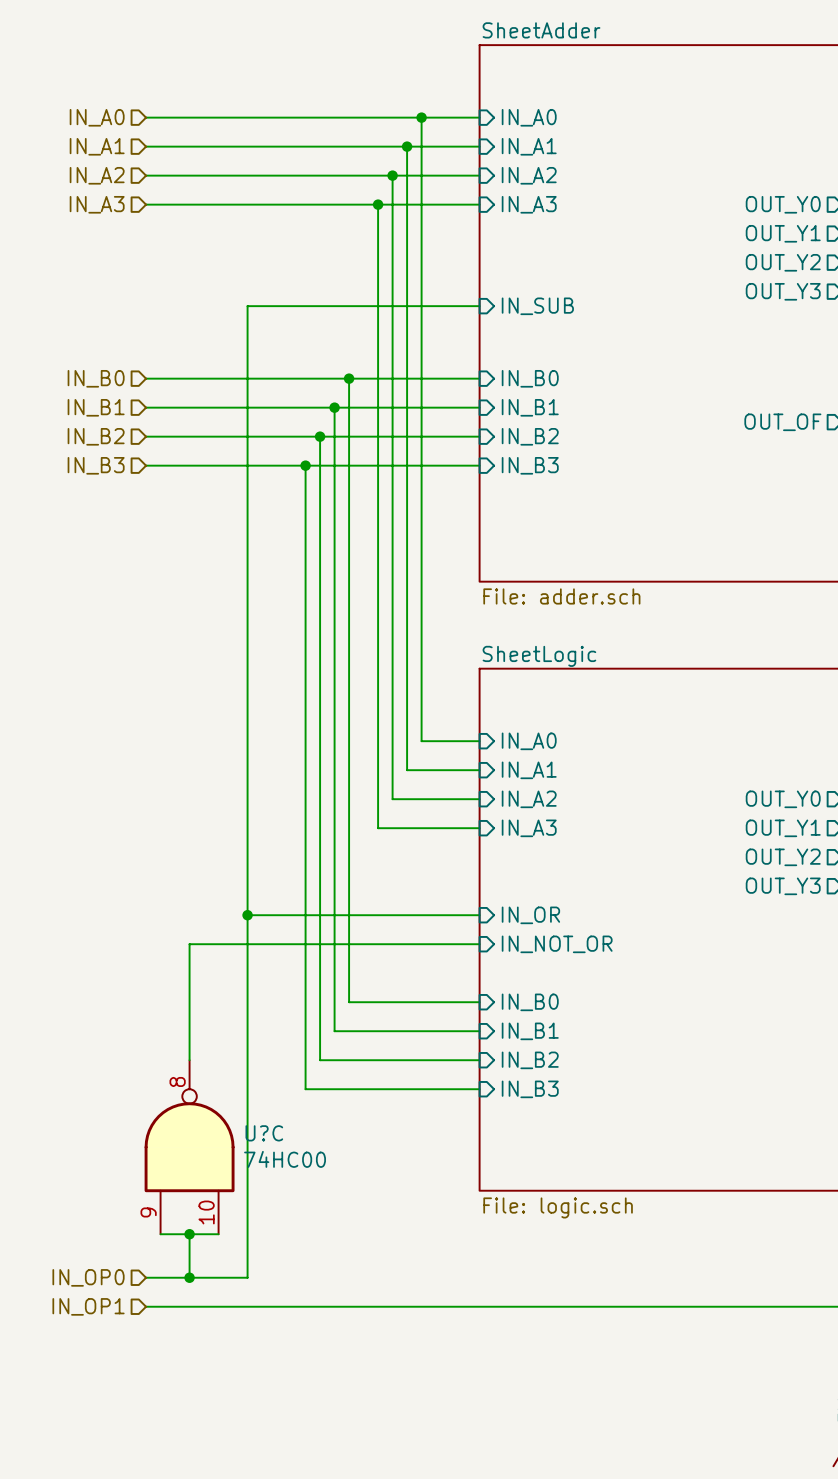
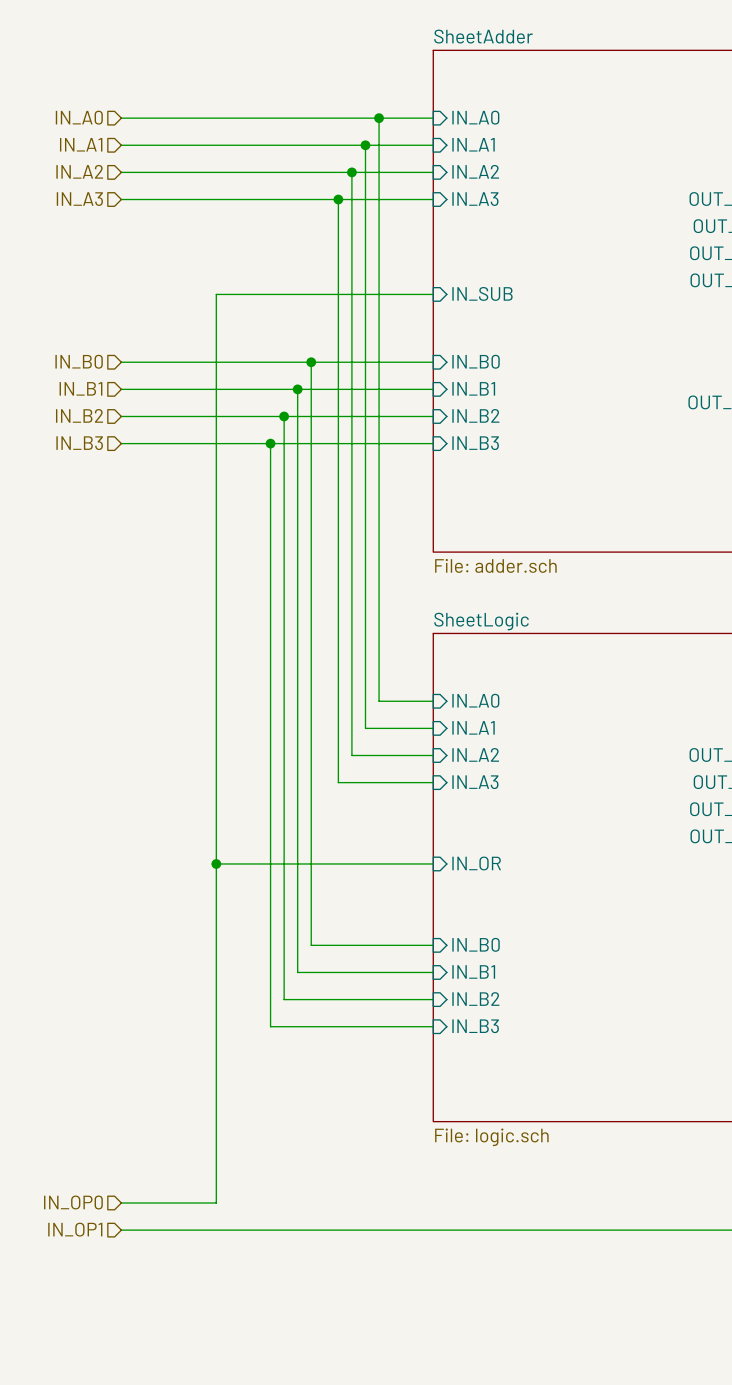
wire: (479, 944) (189, 944) (189, 1060) -> none
sheet pin: IN_NOT_OR (557, 944) -> none
U?C: 74HC00 (189, 1147) -> none
wire: (160, 1234) (218, 1234) -> none
wire: (189, 1234) (189, 1277) -> none
junction: (189, 1234) -> none
junction: (189, 1277) -> none

